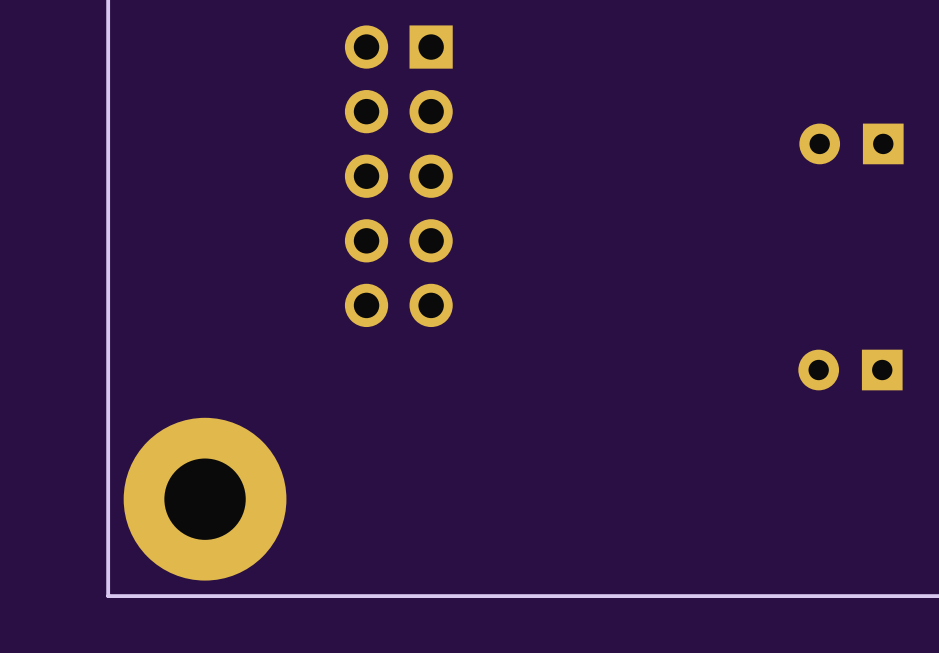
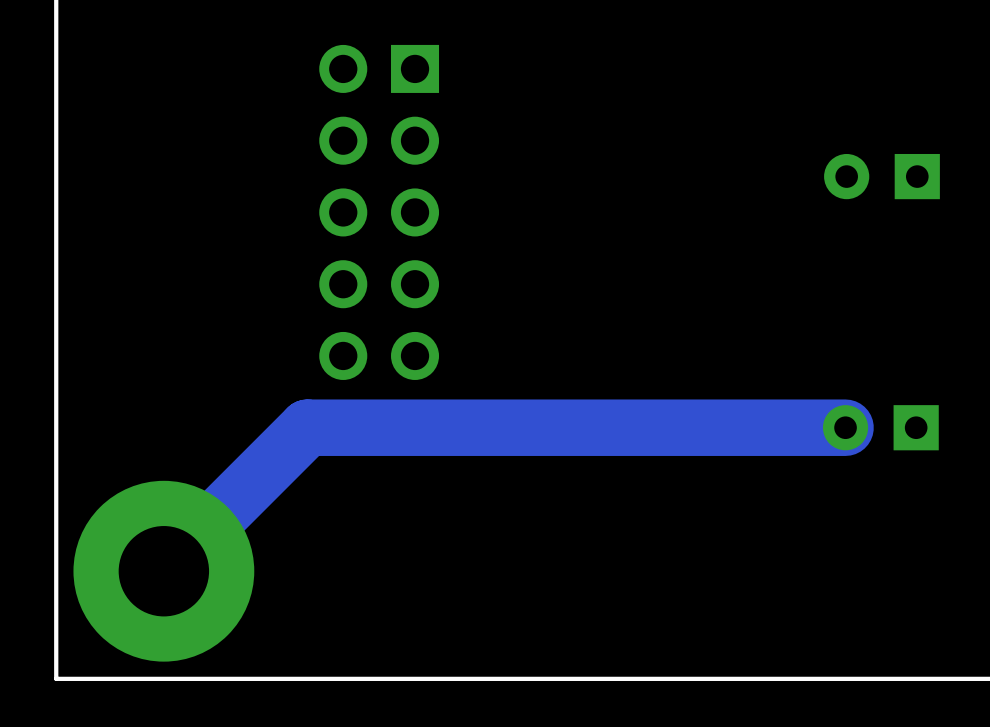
track: none -> (845, 427) (307, 427) (163, 571)

